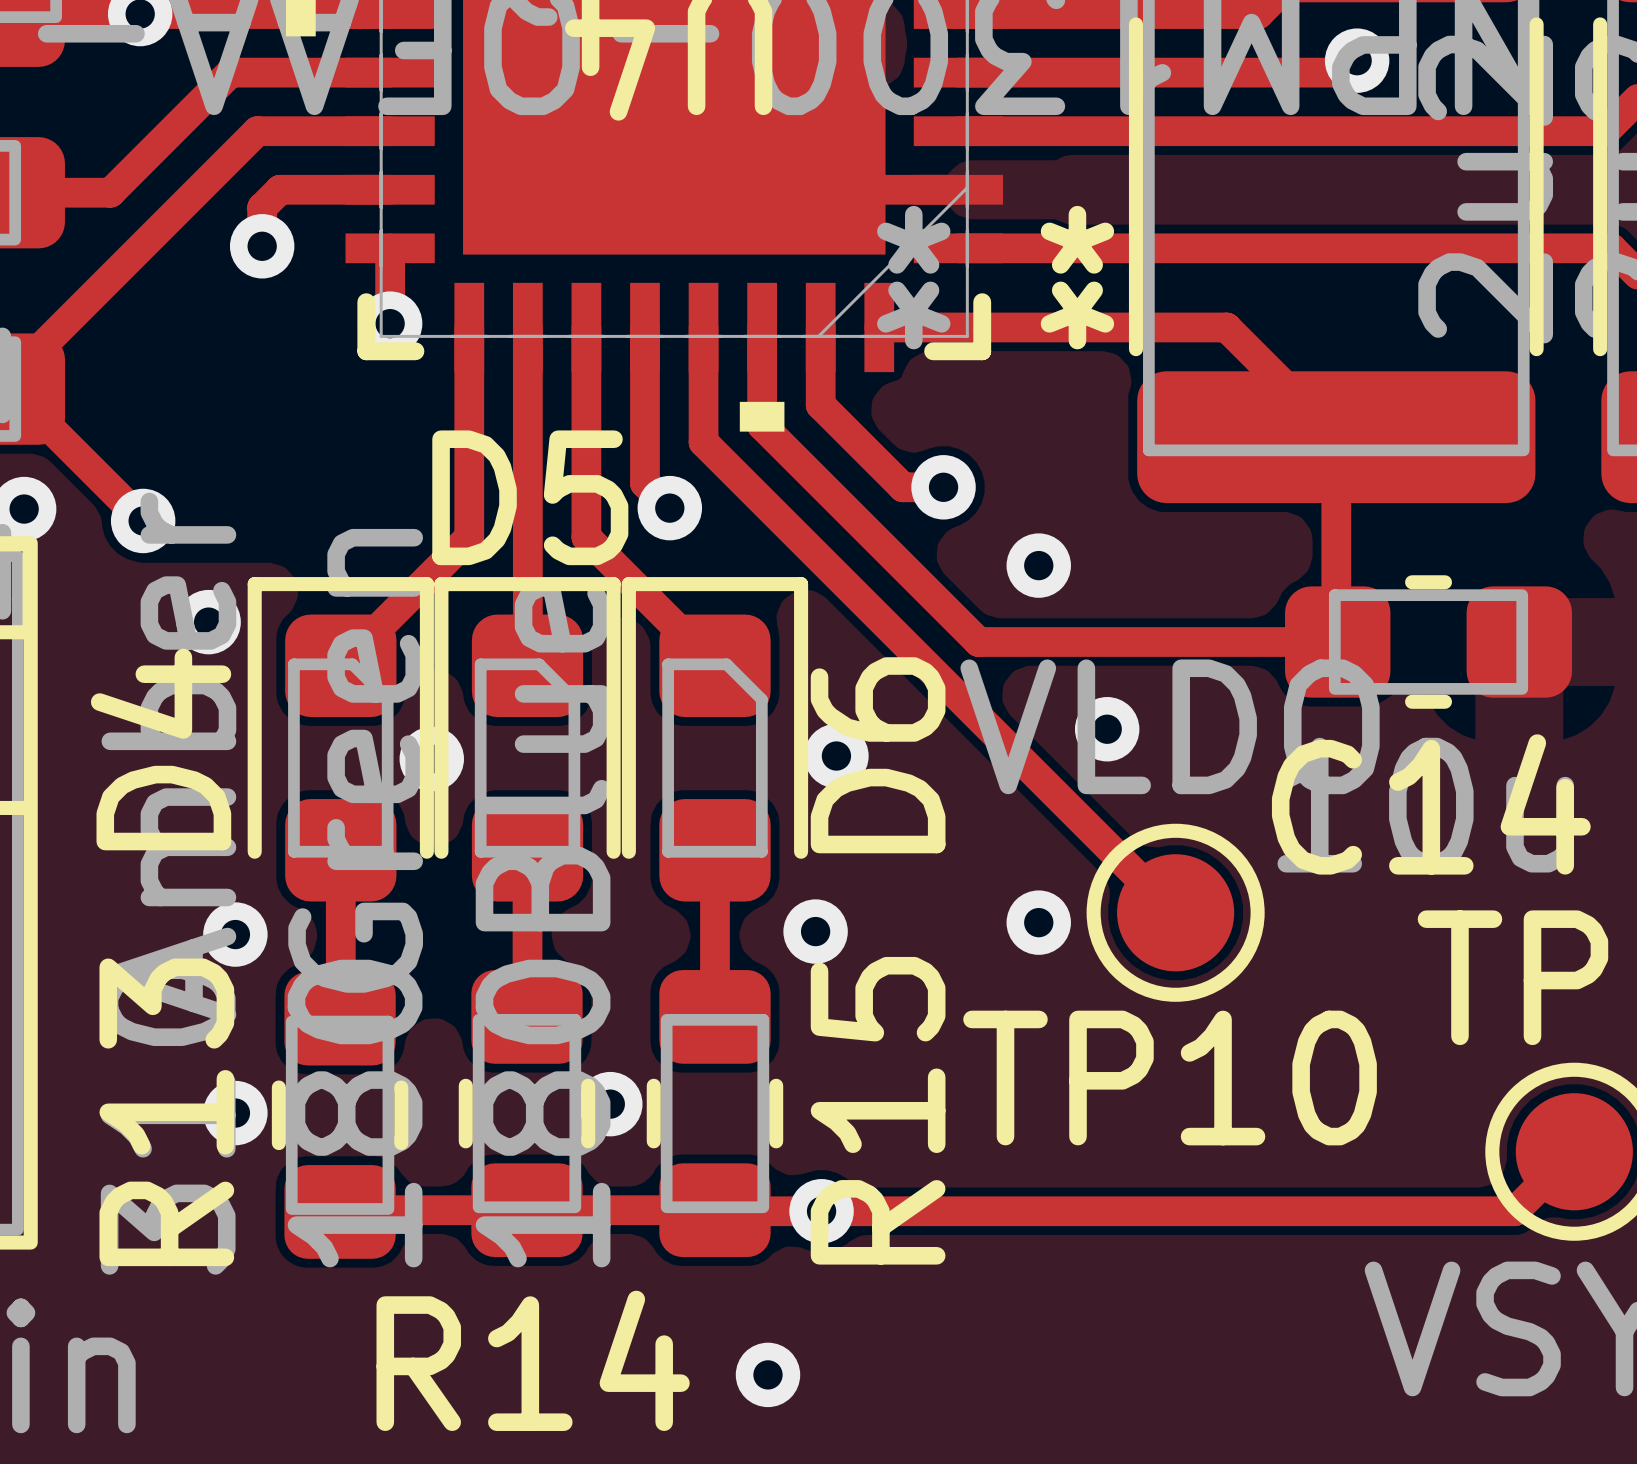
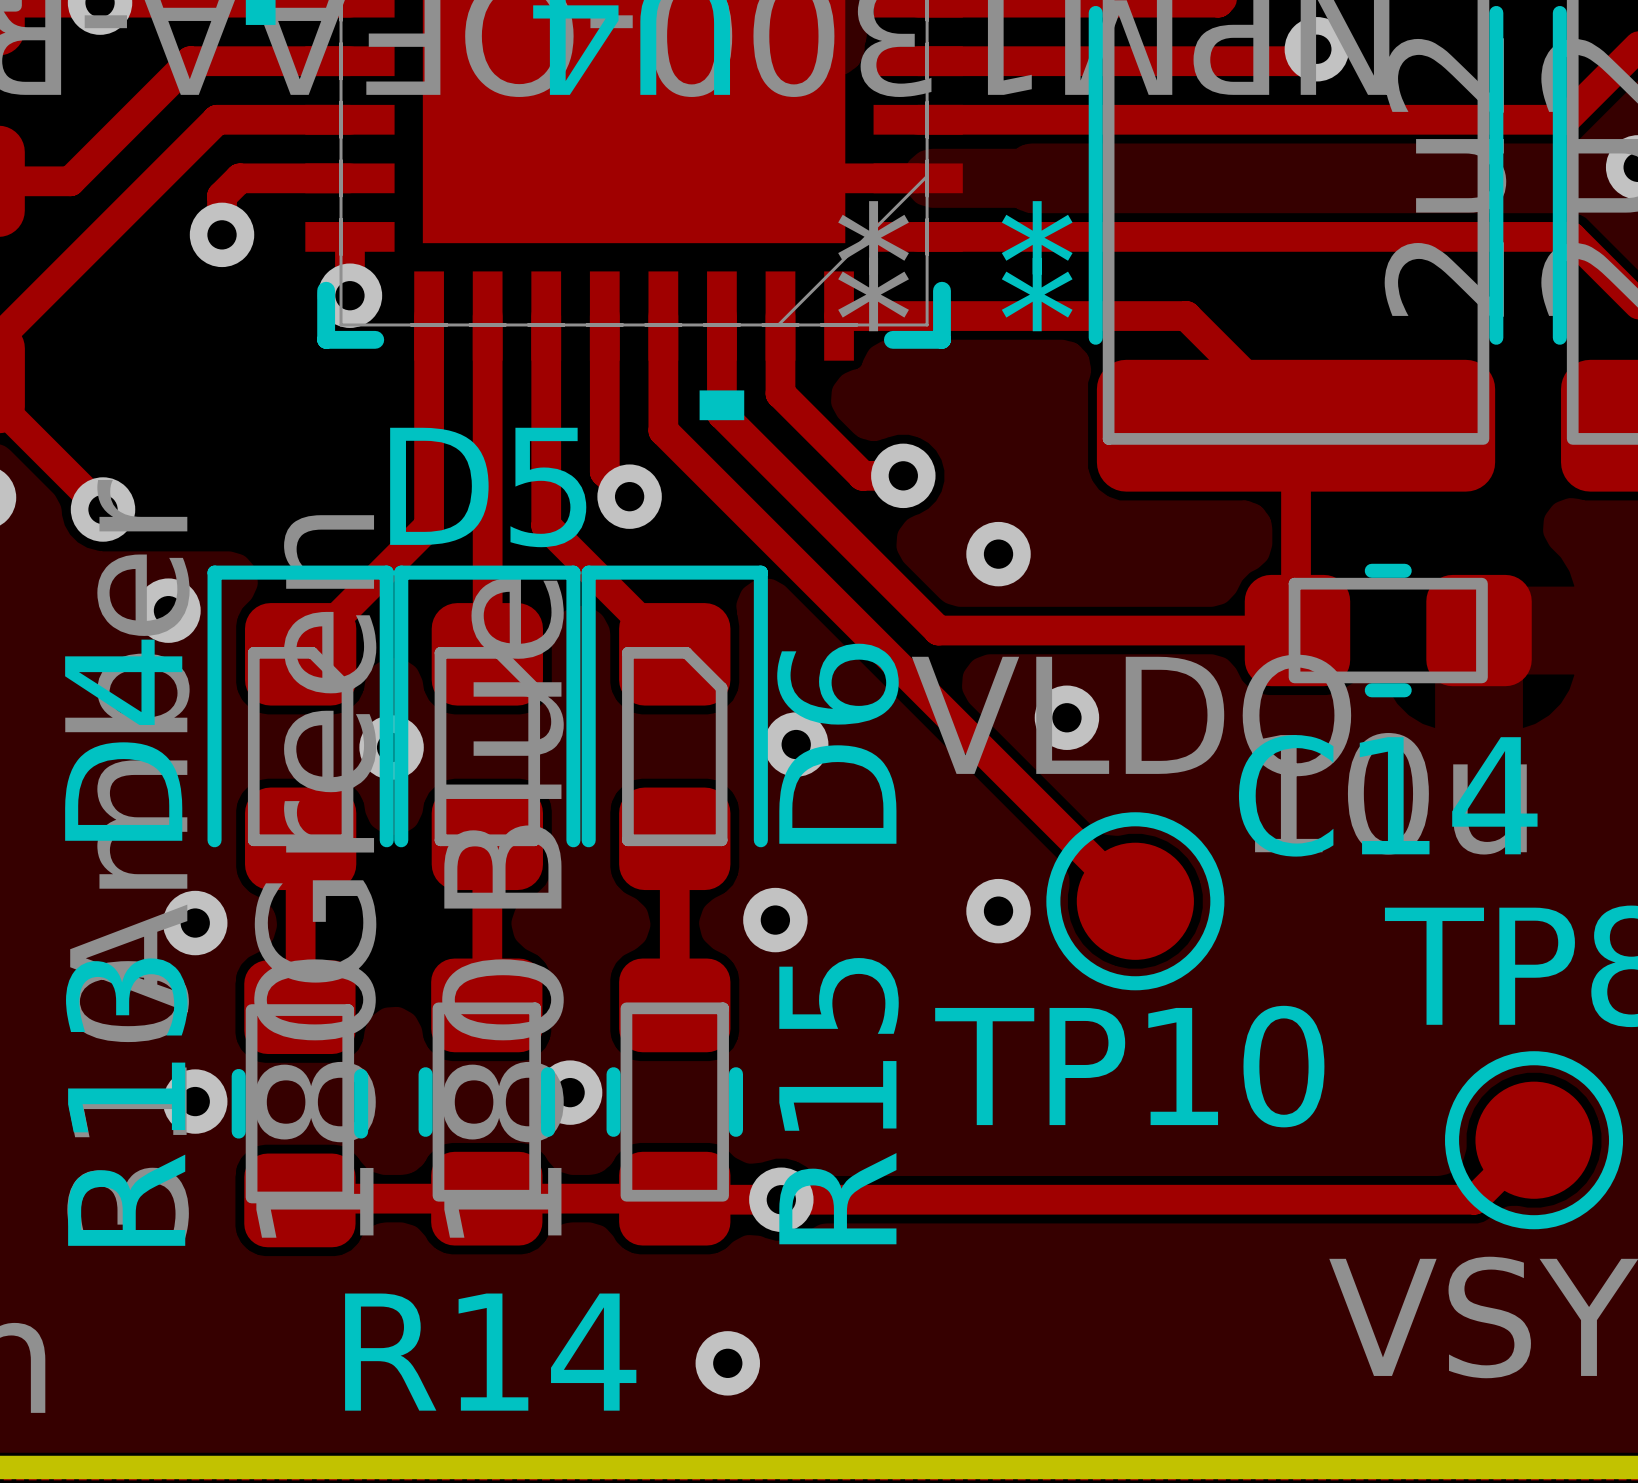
via position: (390, 323) -> (349, 295)

